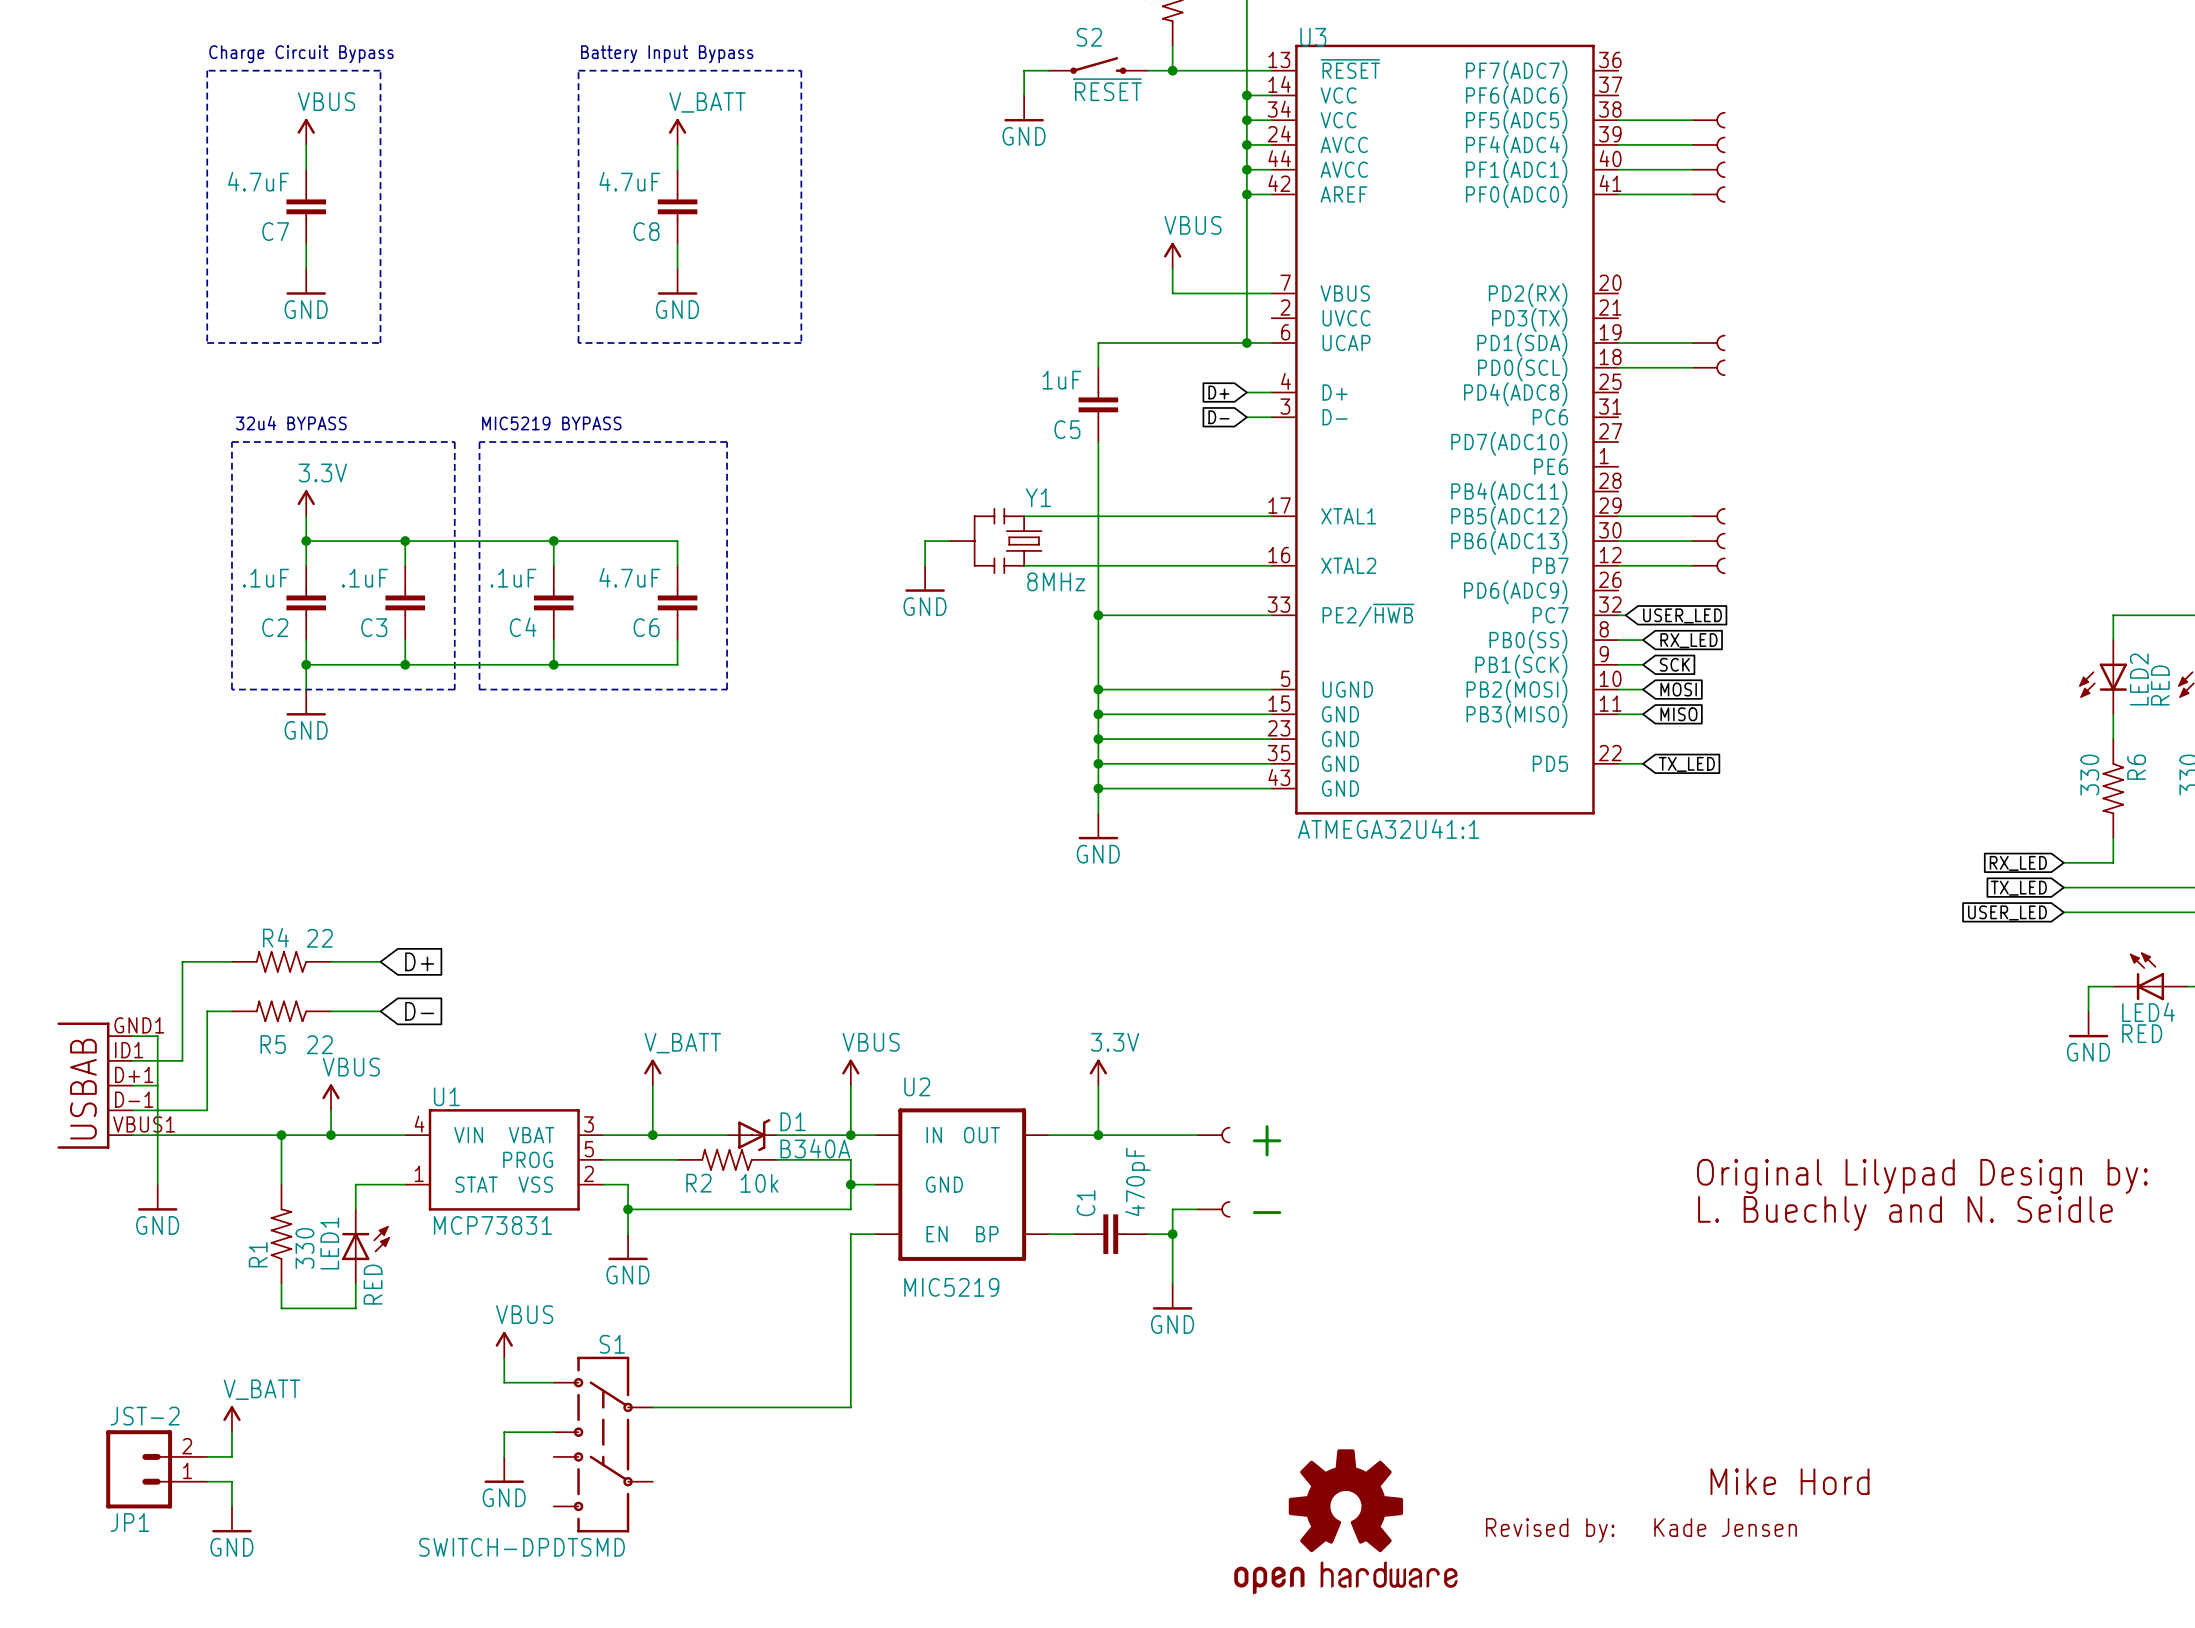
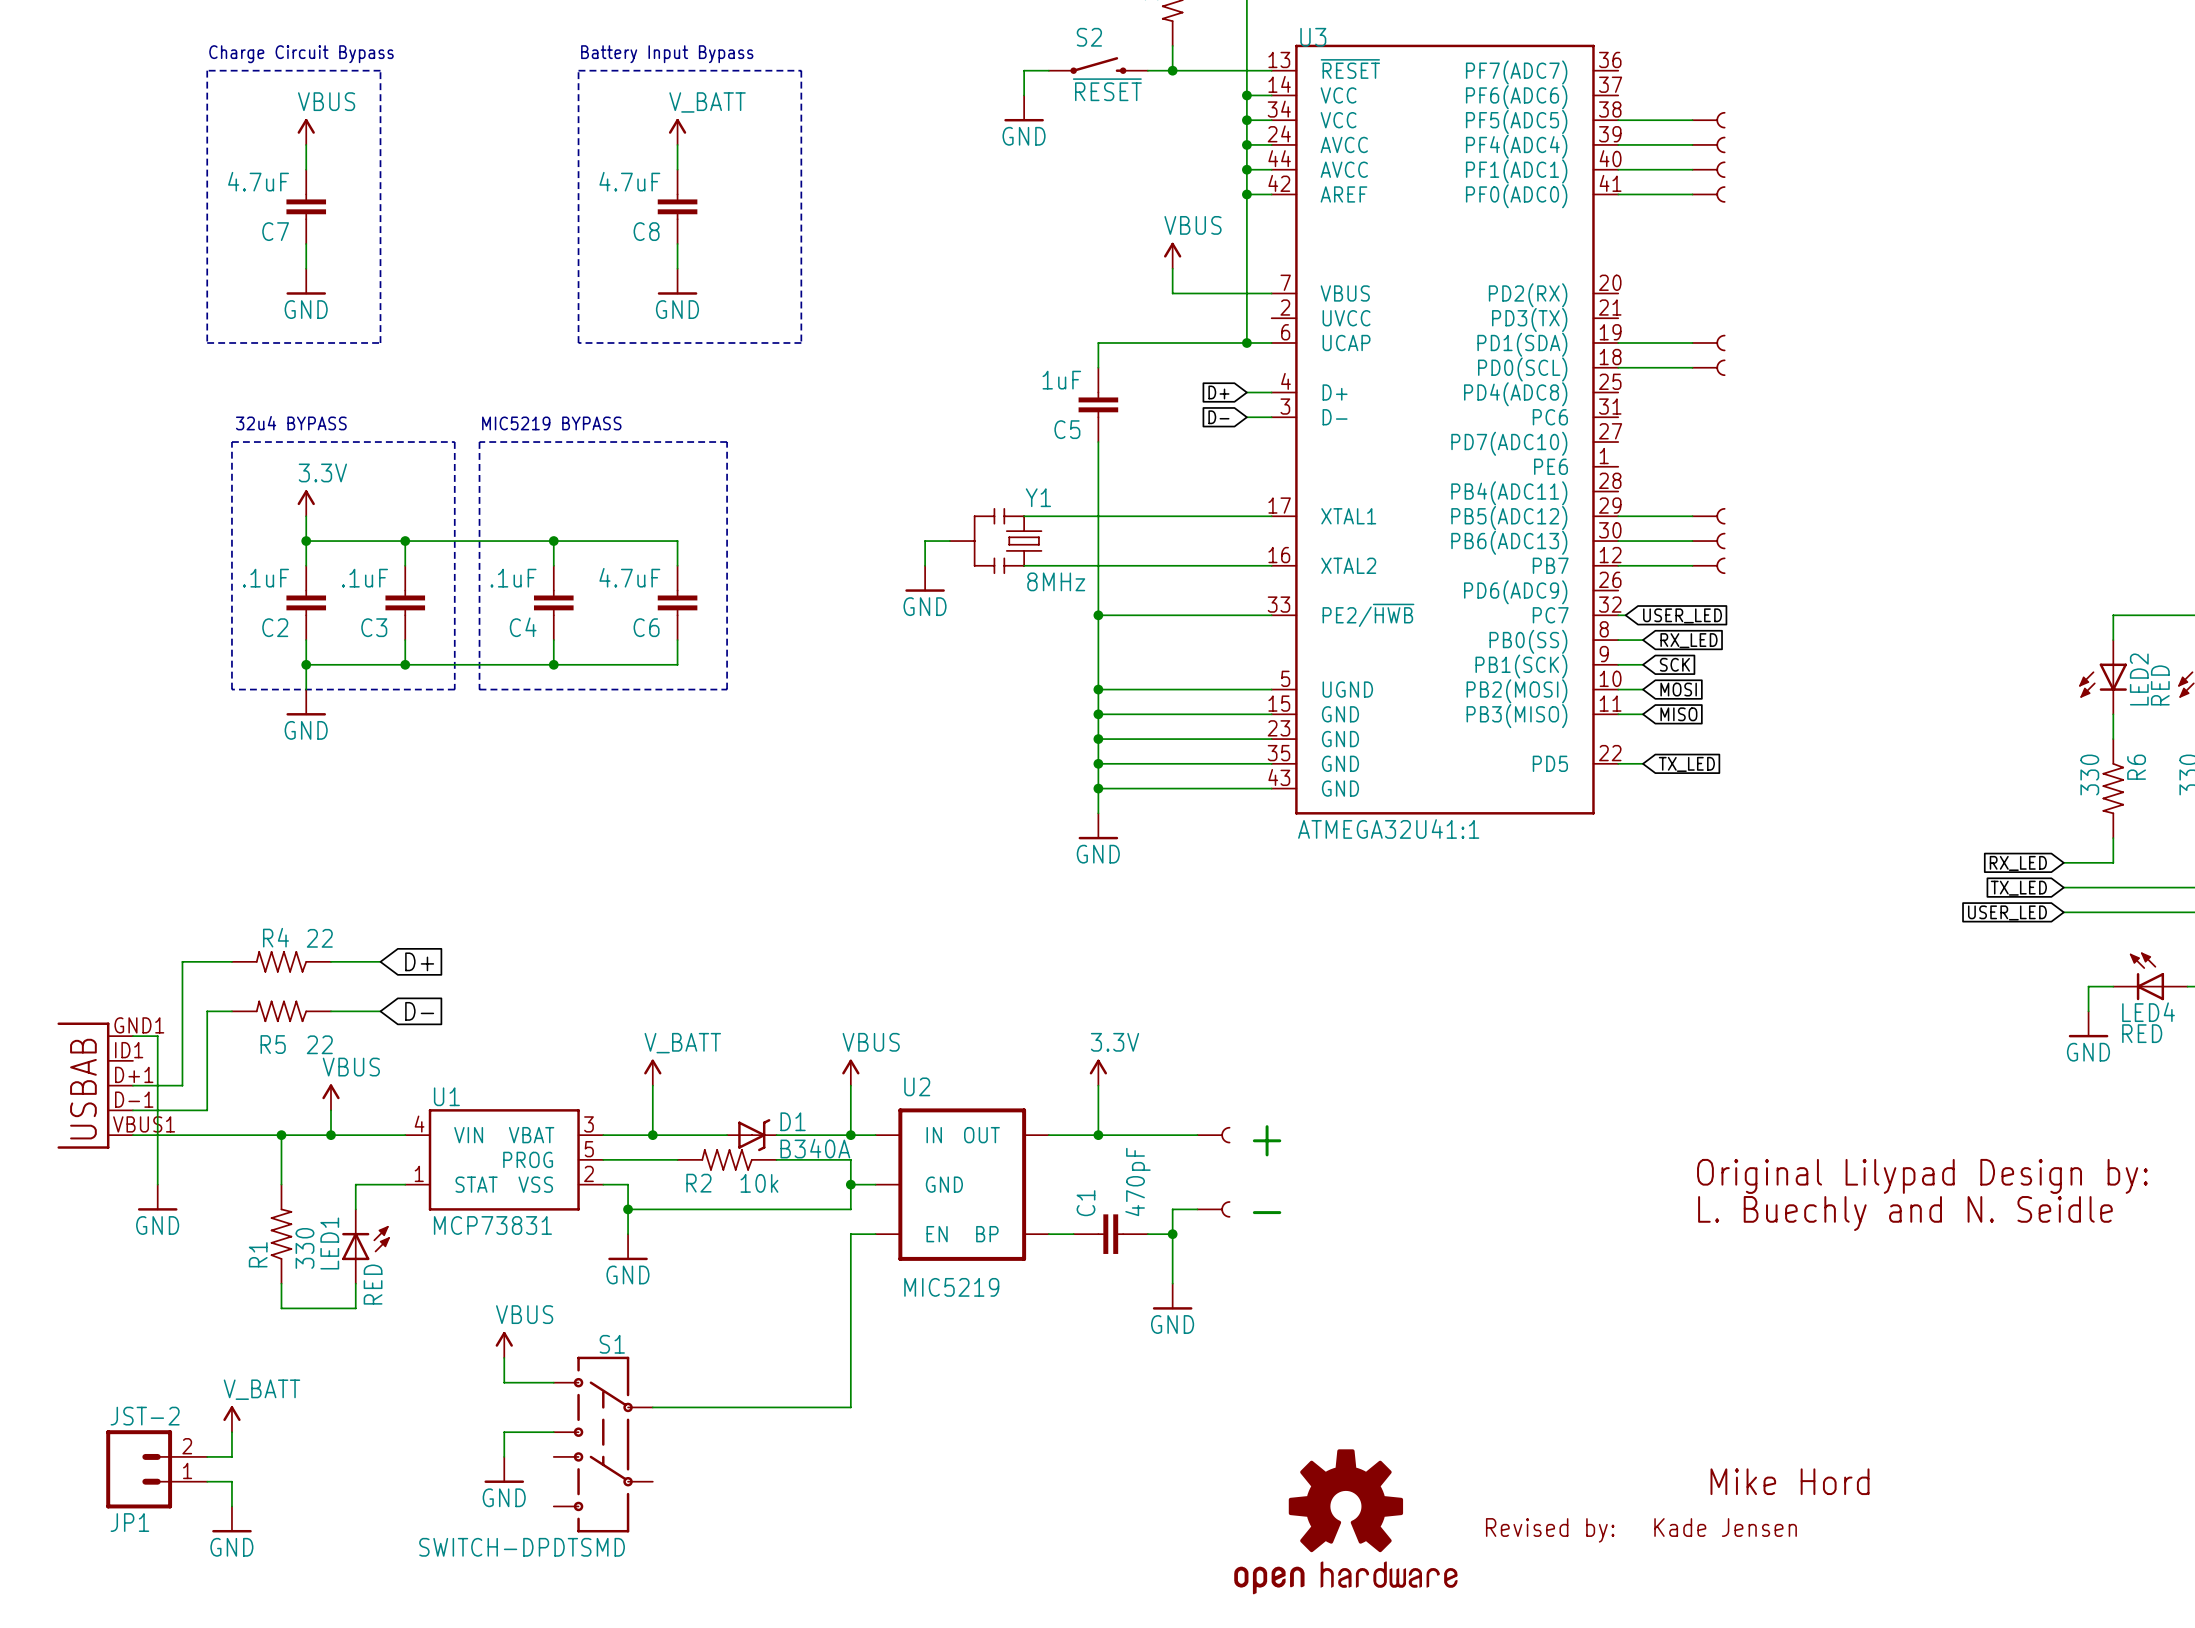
wire: (132, 1060) (182, 1060) -> (157, 1085) (182, 1085) (182, 1060)

